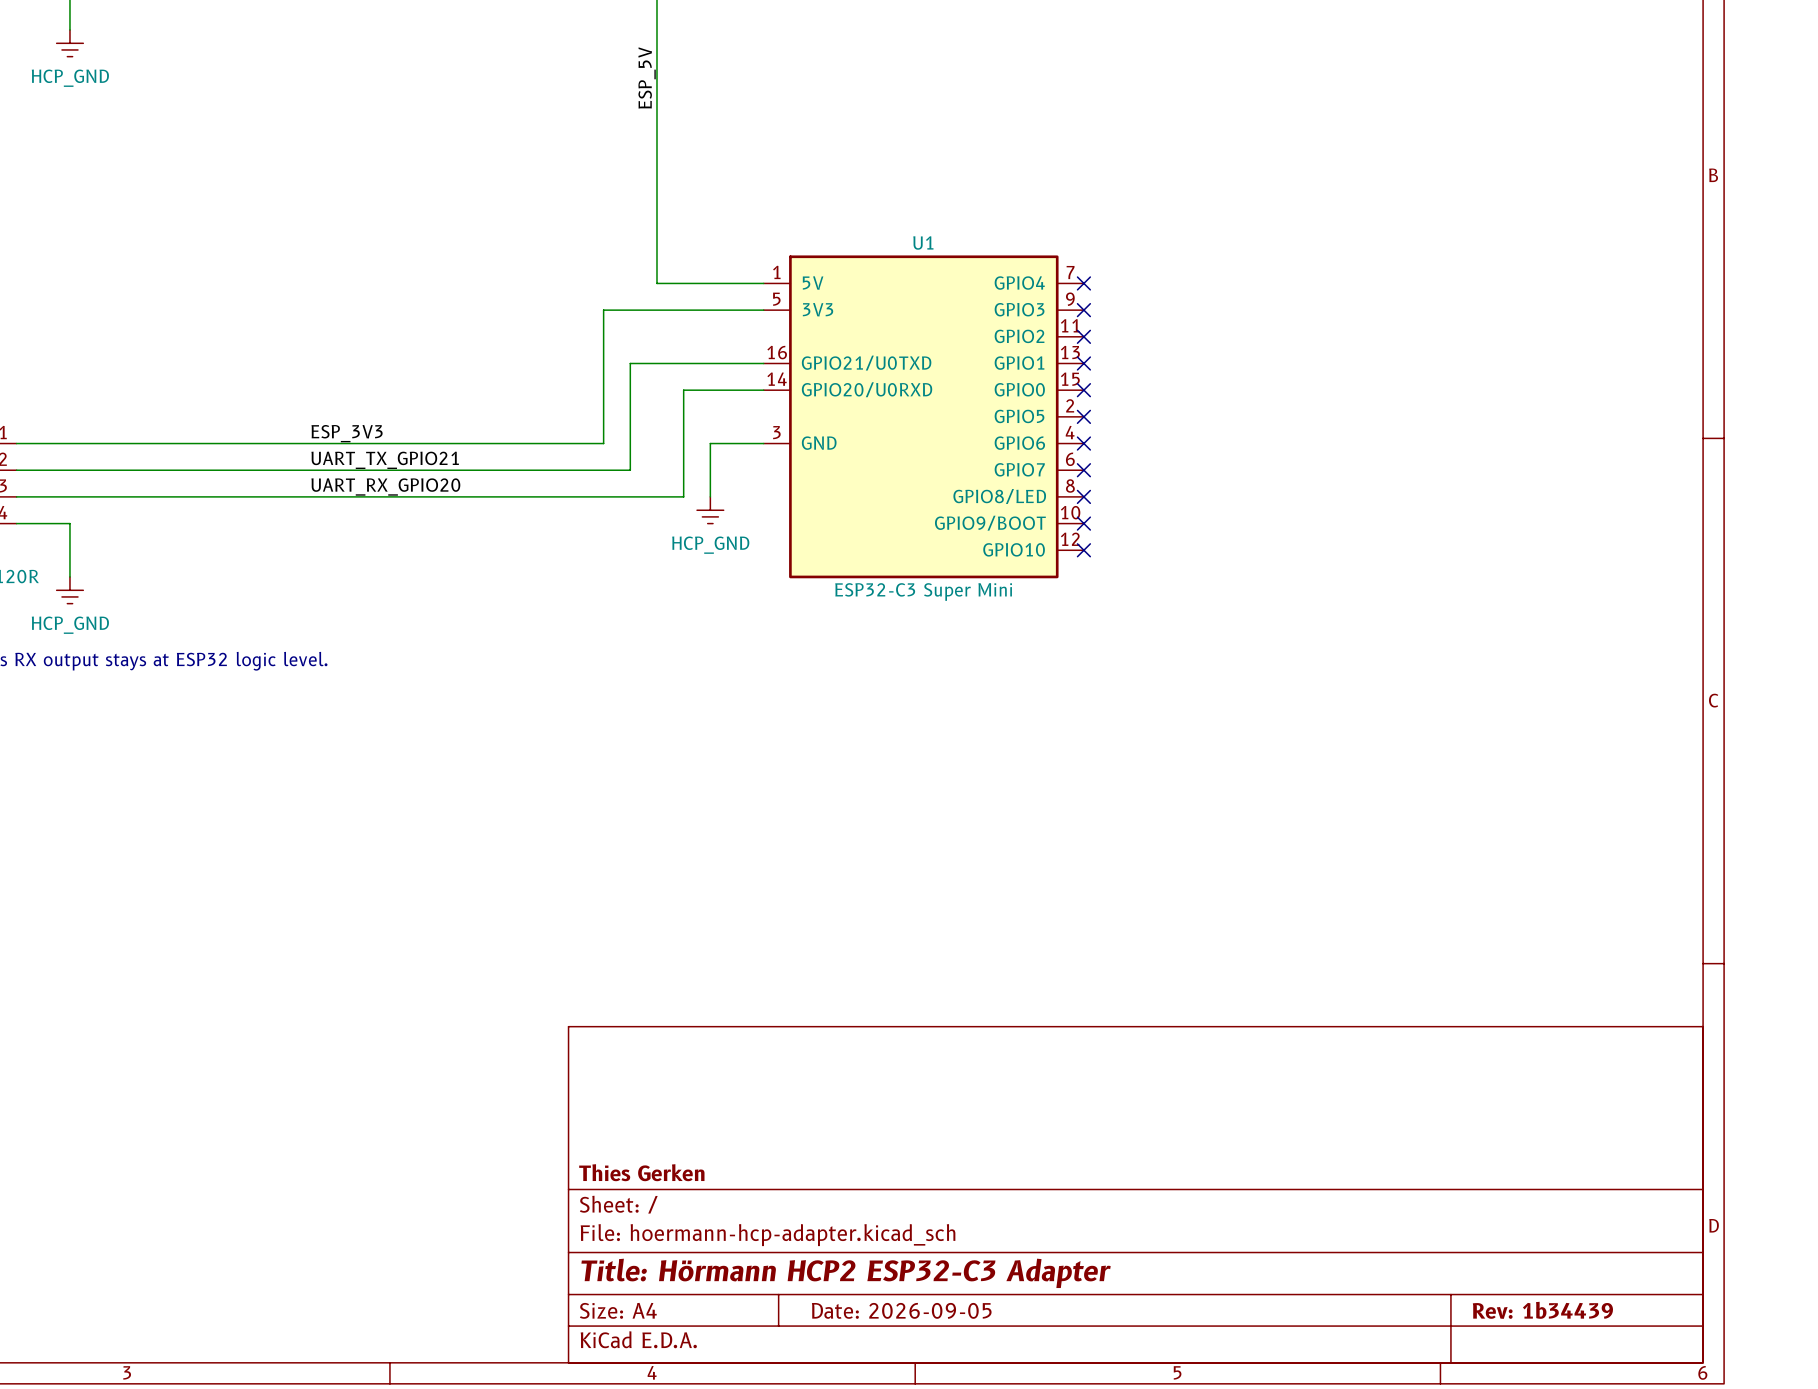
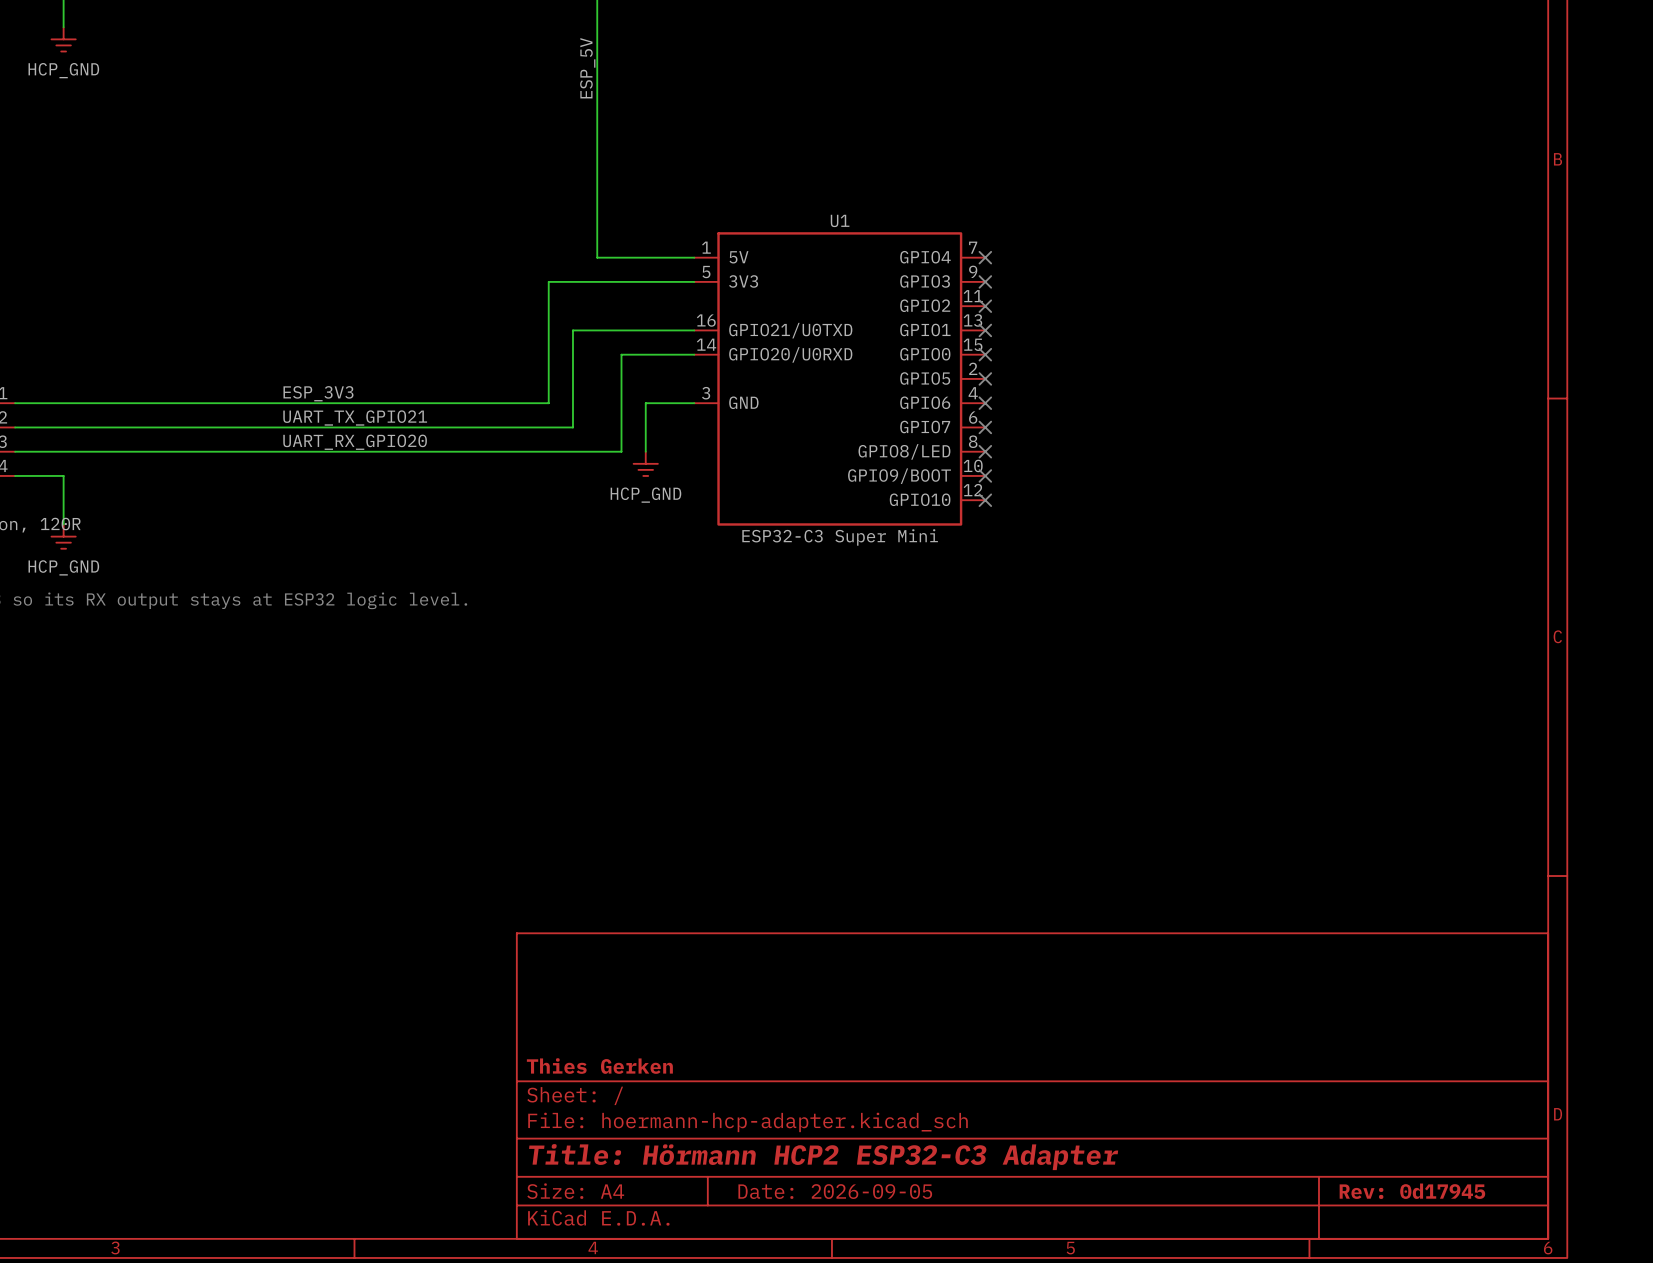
title block: Rev: 1b34439 (1542, 1310) -> Rev: 0d17945 (1412, 1191)

